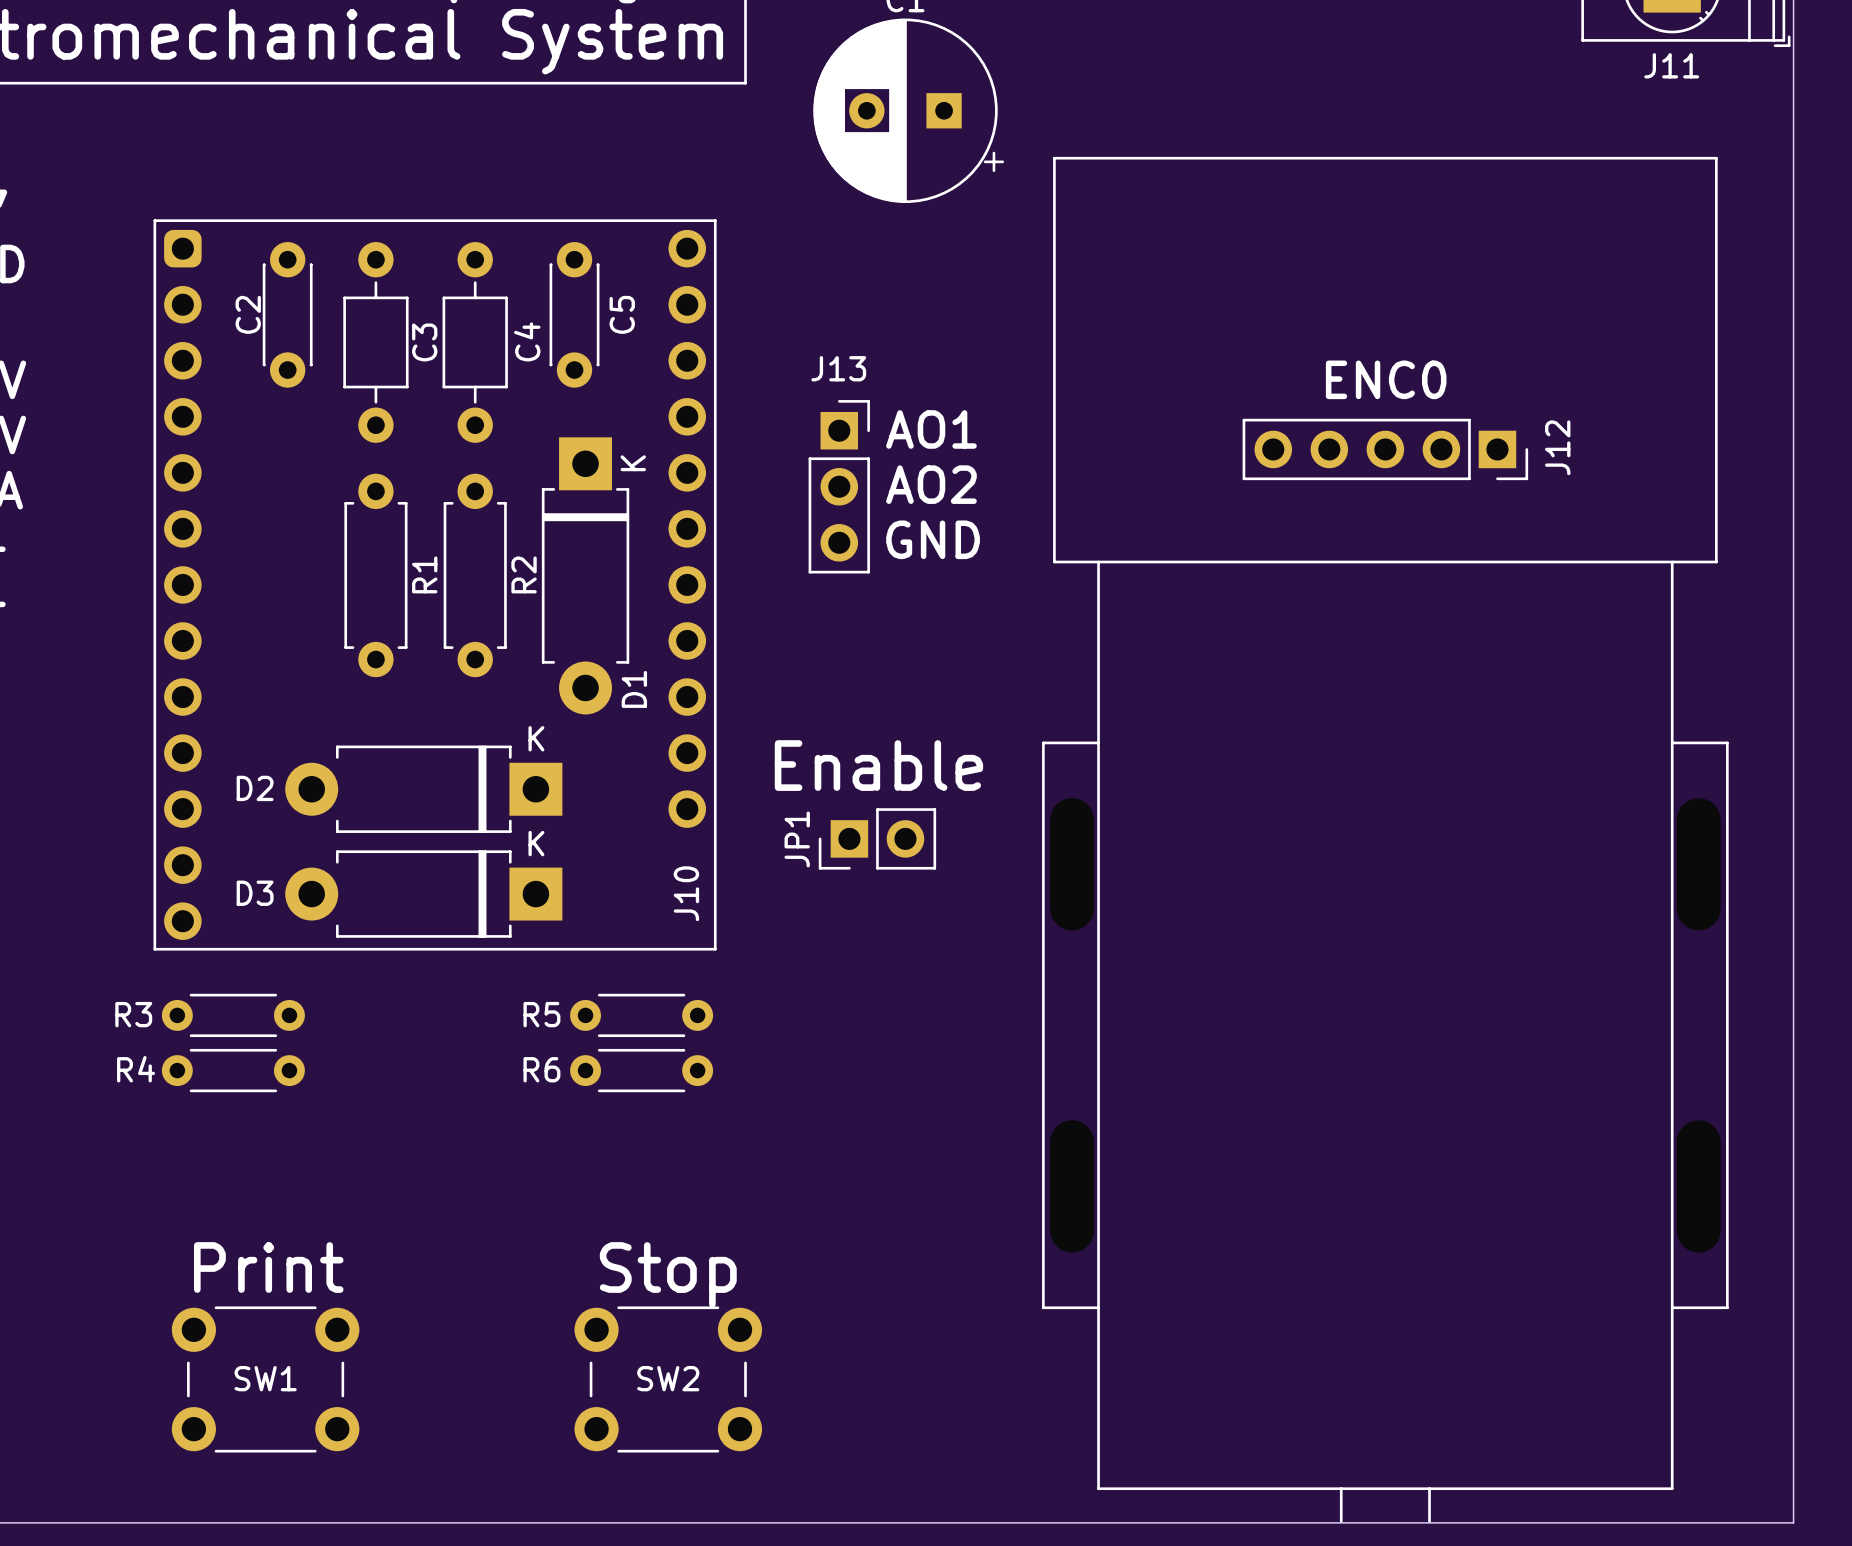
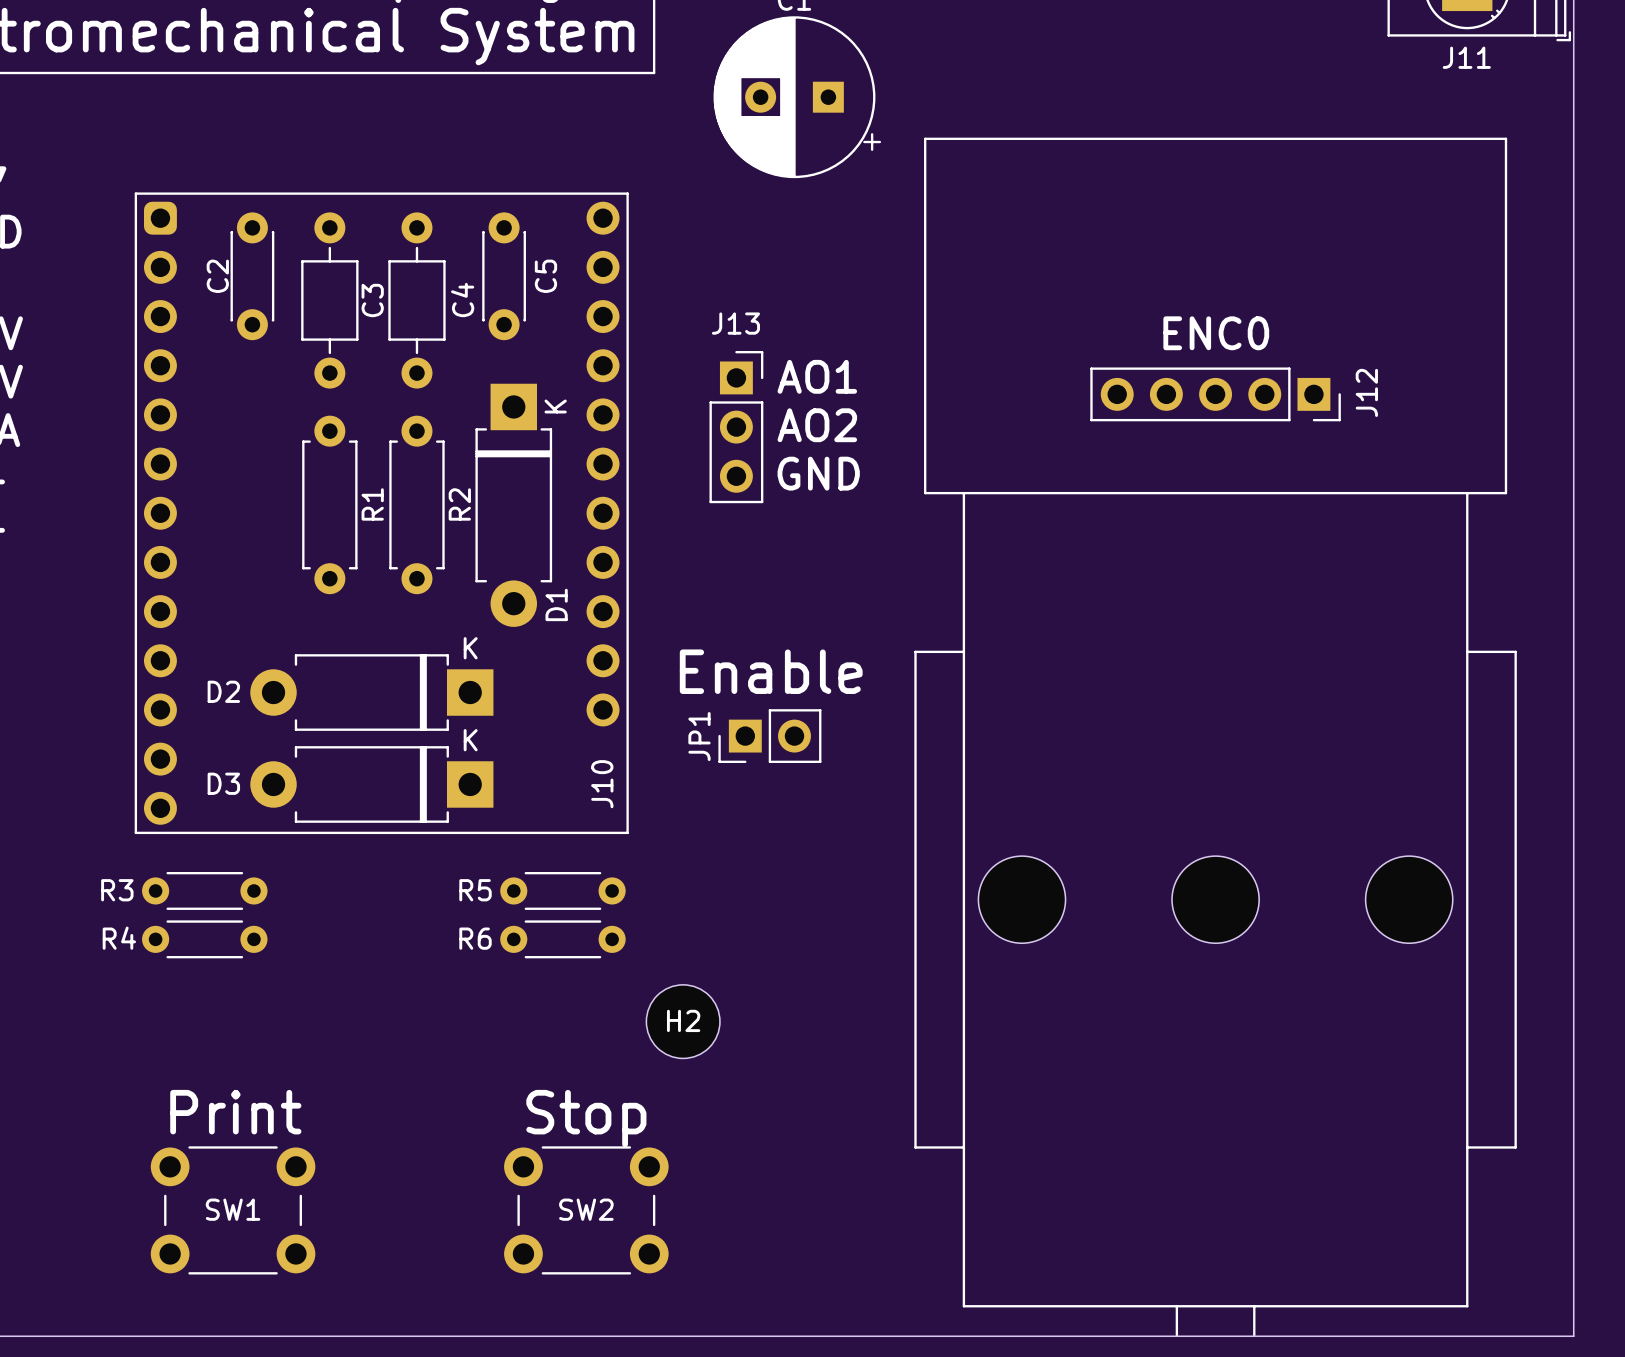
J12 footprint: [1042, 156, 1729, 1524] -> [914, 137, 1517, 1337]
H2: none -> (683, 1021)

